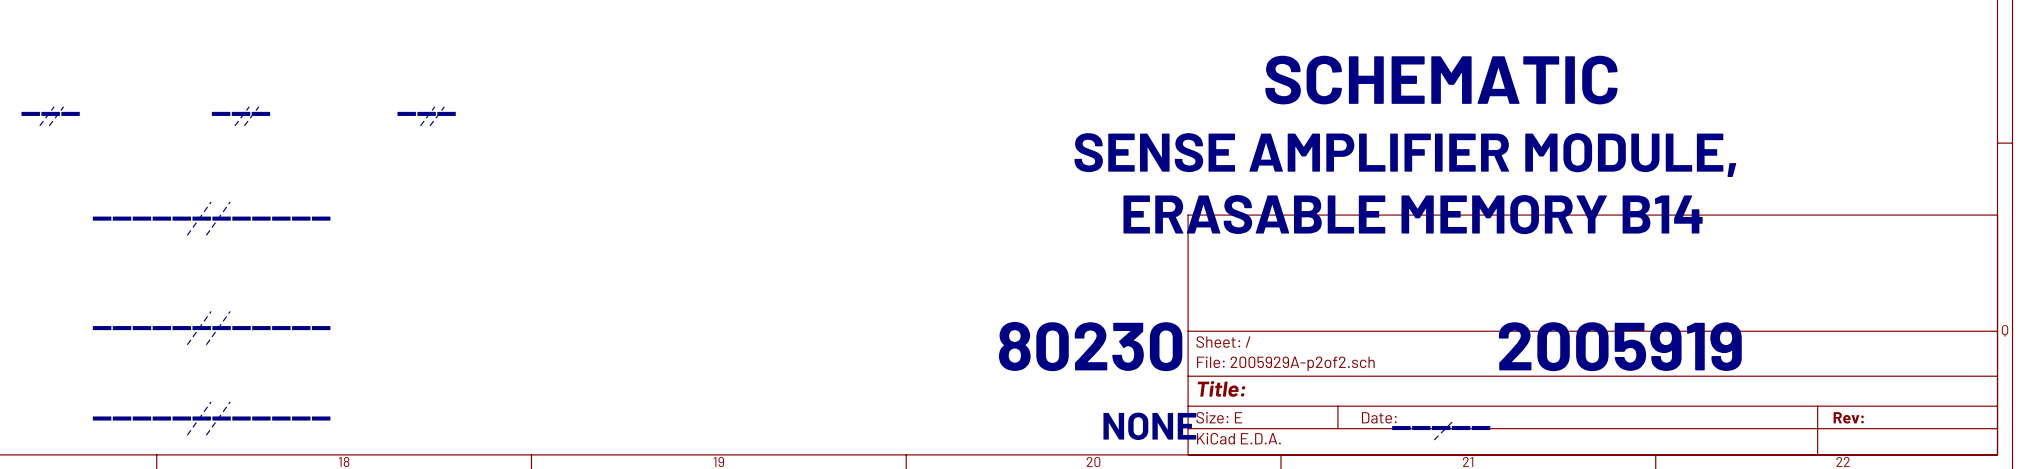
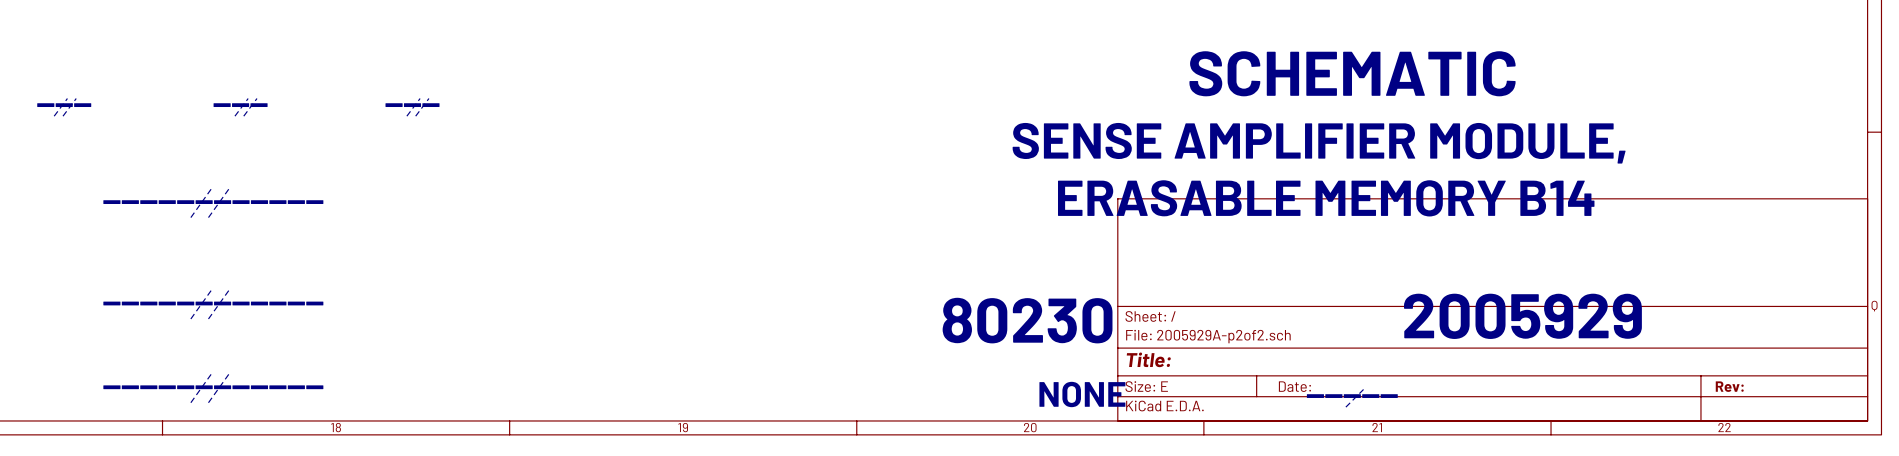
text: 2005919 (1620, 346) -> 2005929 (1522, 316)

